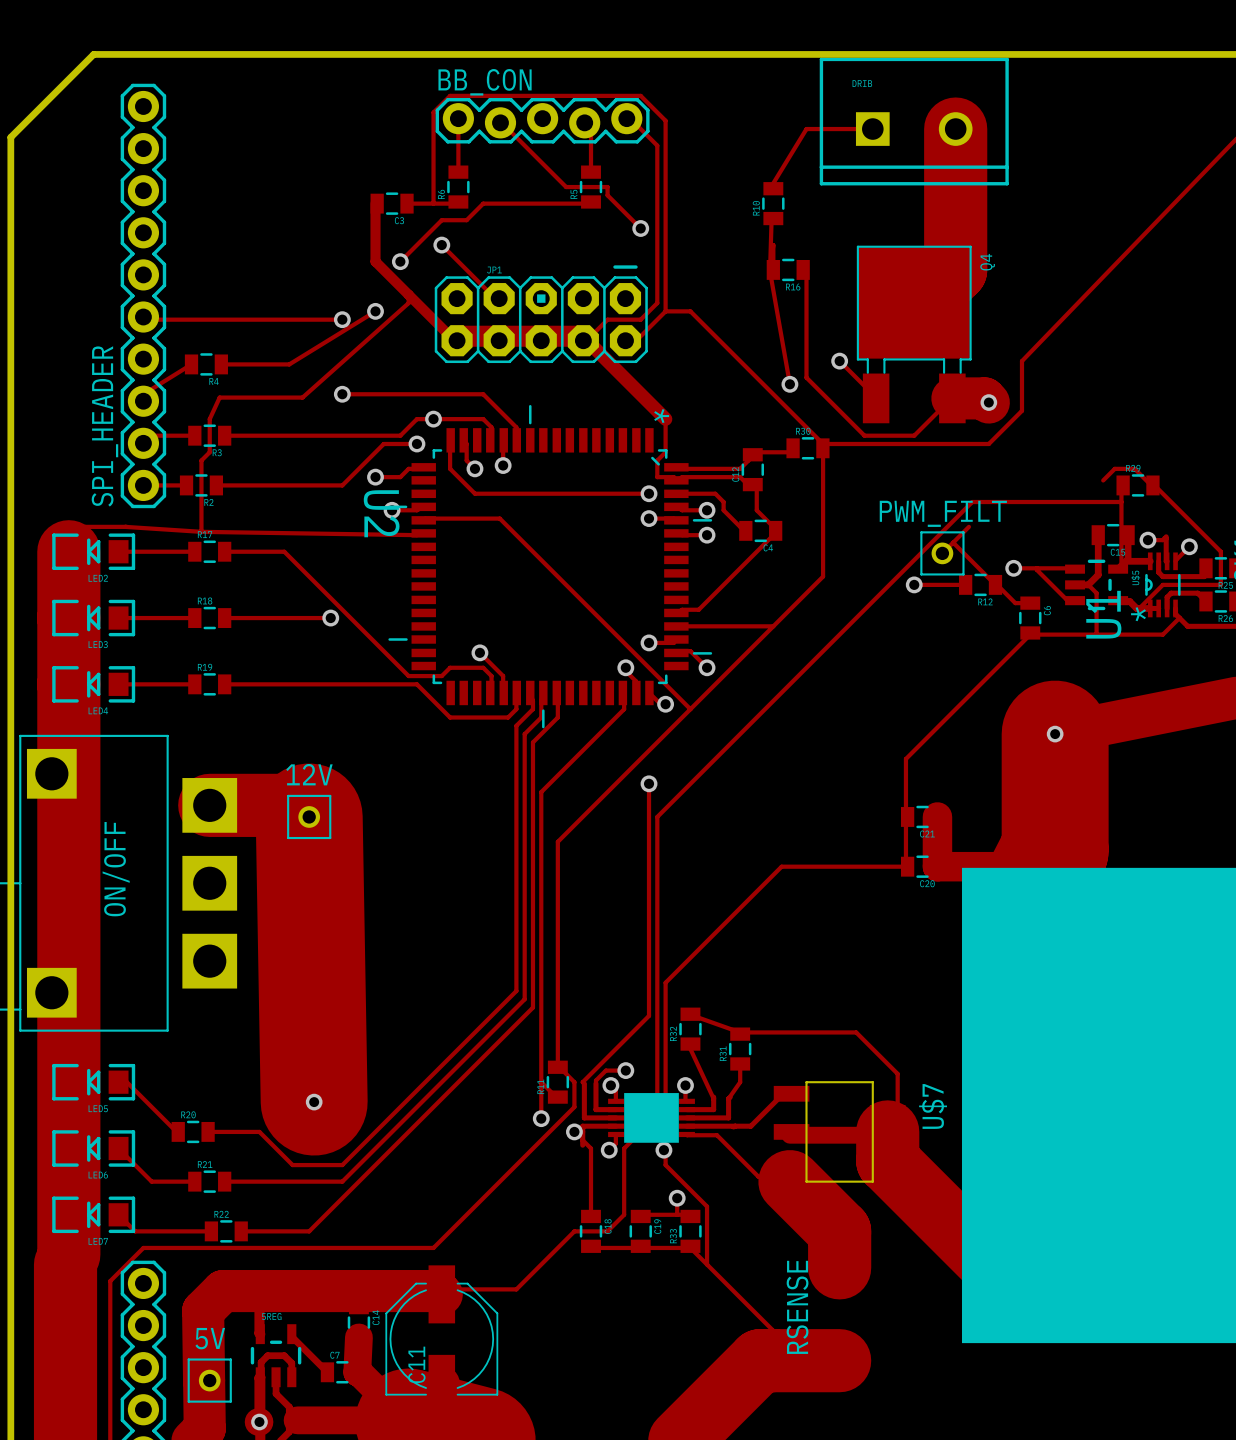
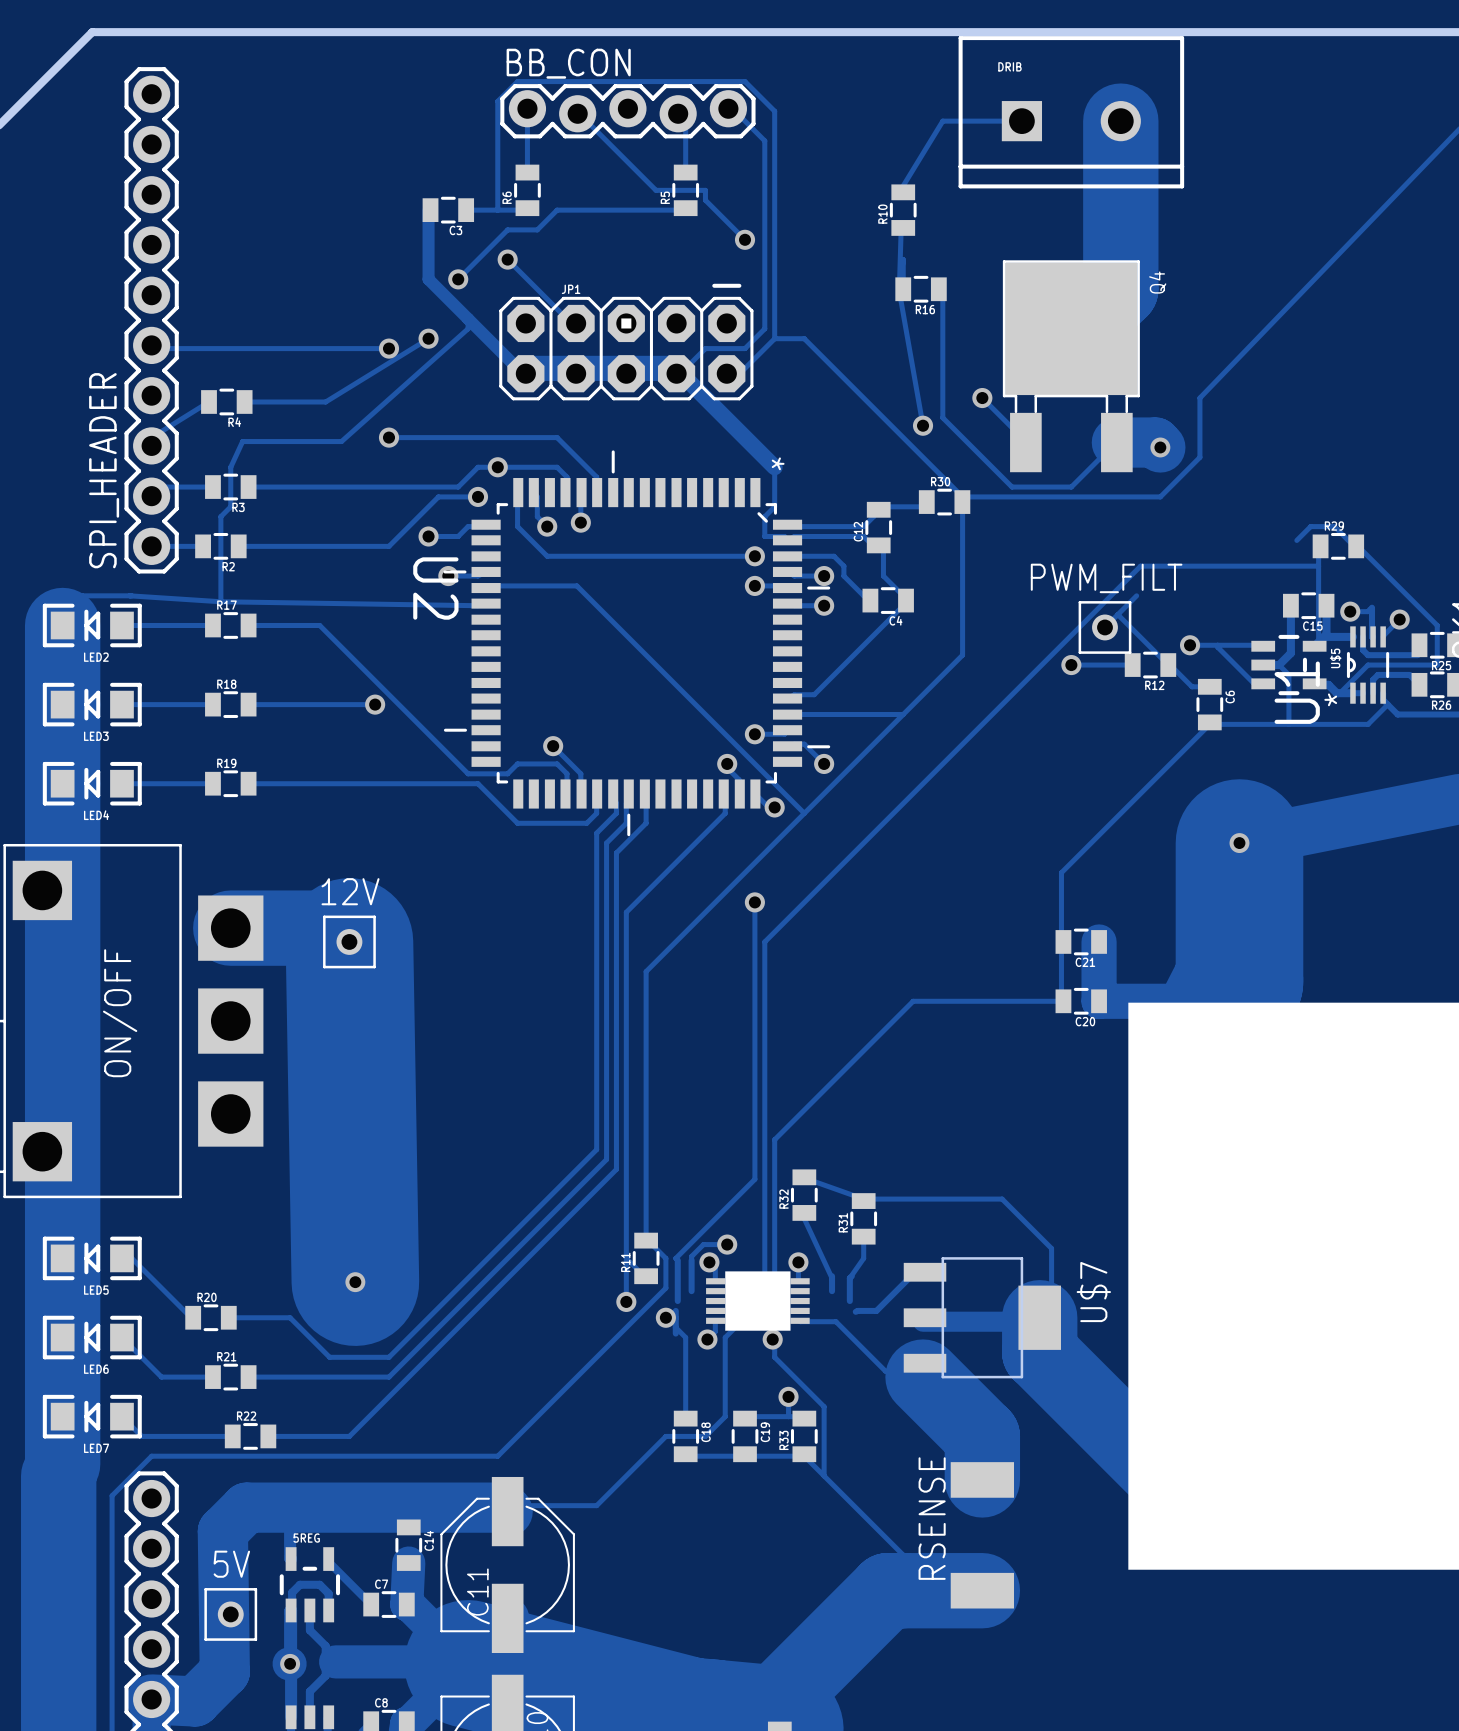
track: (595, 1109) (616, 1109) -> none
track: (686, 1109) (713, 1109) -> none
track: (584, 1117) (616, 1117) -> none
track: (686, 1117) (728, 1117) -> none
track: (582, 1126) (616, 1126) -> none
track: (686, 1126) (735, 1126) -> none

